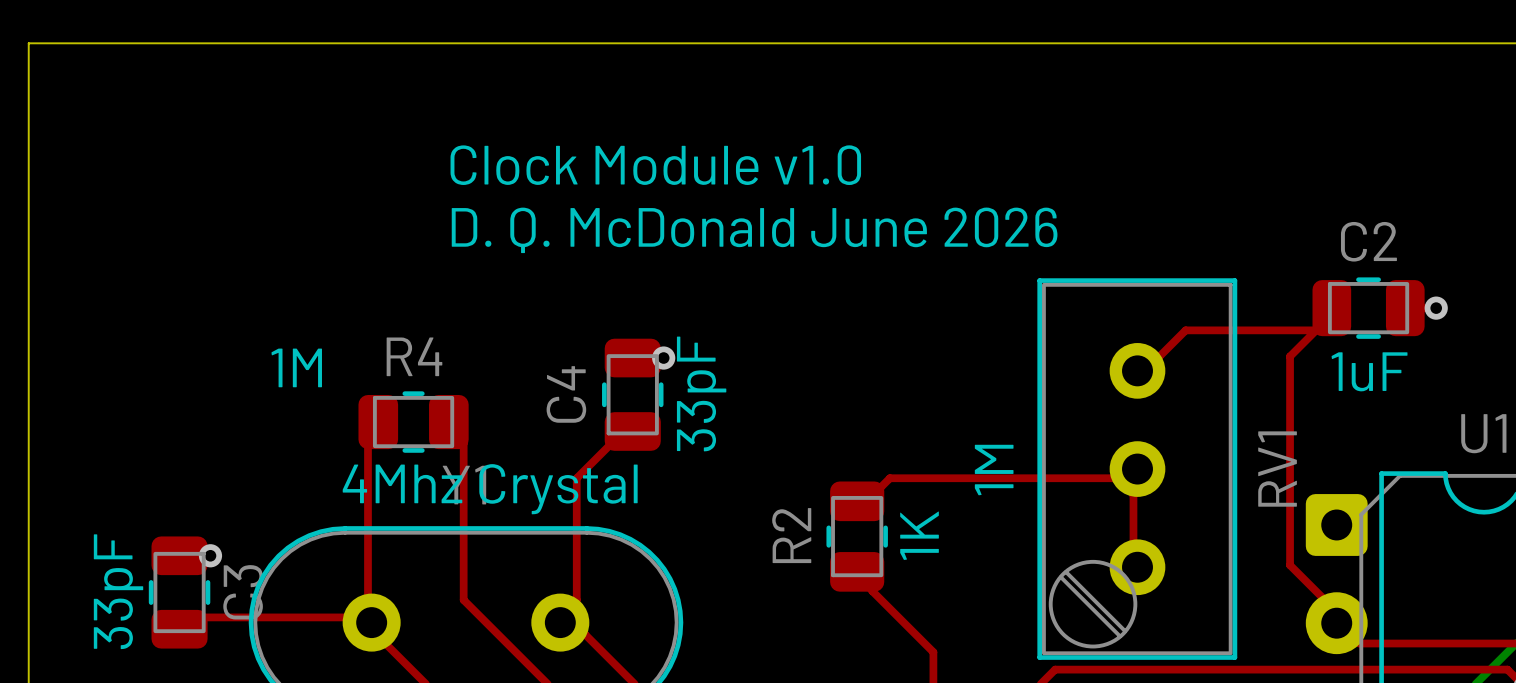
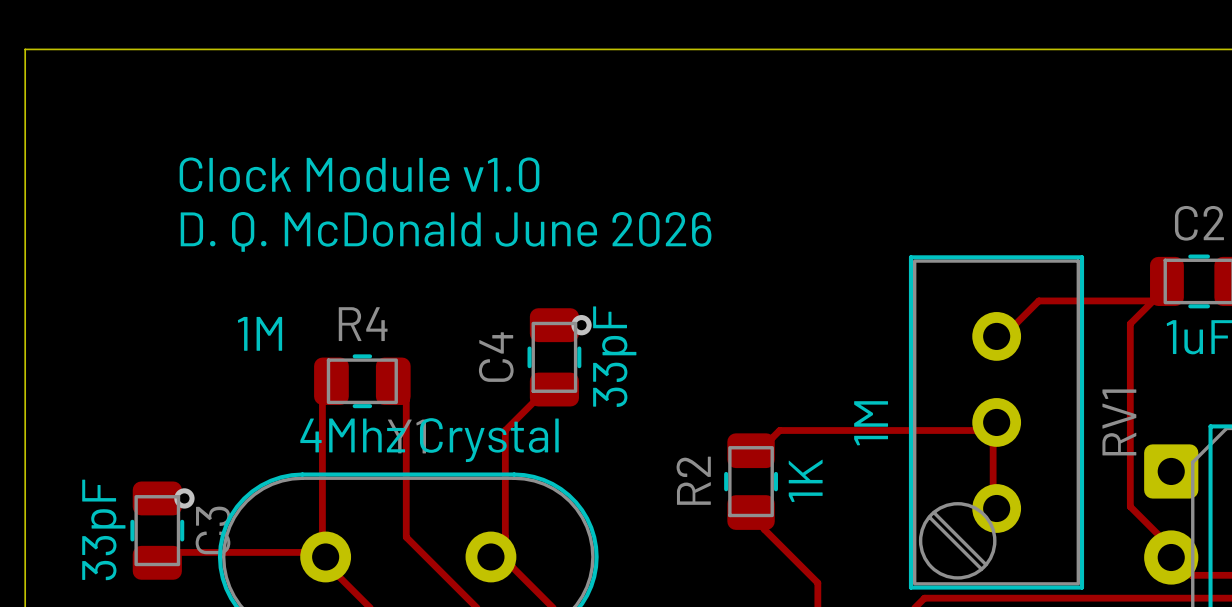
text position: Clock Module v1.0 (655, 165) -> Clock Module v1.0 (359, 174)
text position: D. Q. McDonald June 2026 (754, 230) -> D. Q. McDonald June 2026 (446, 231)

